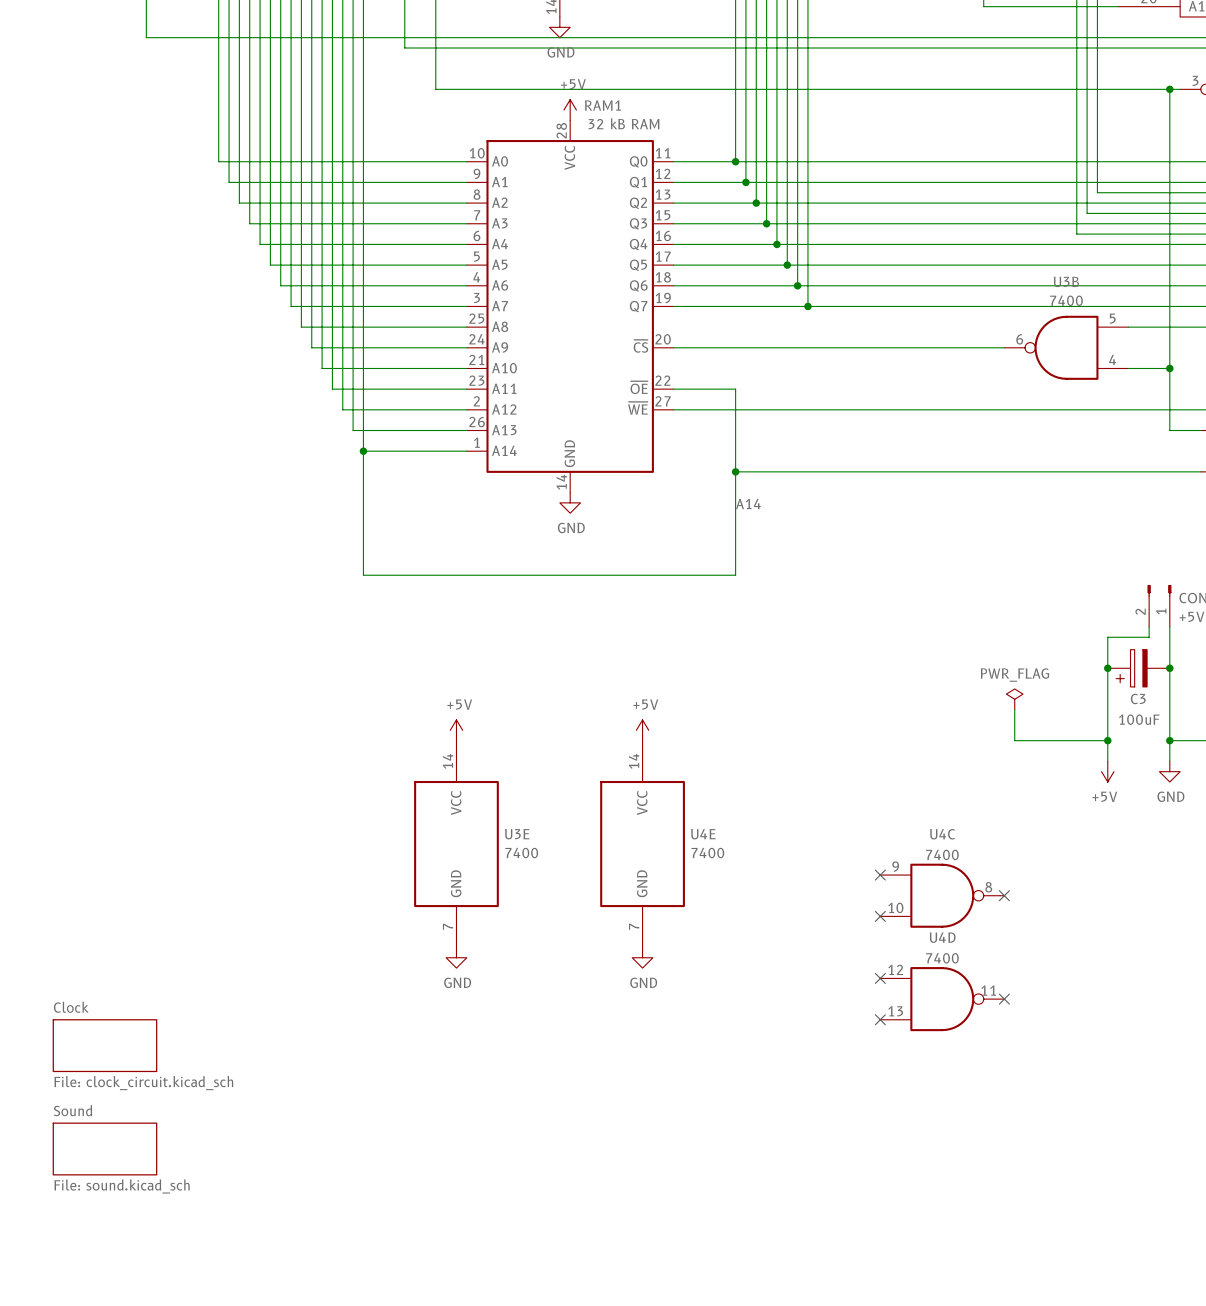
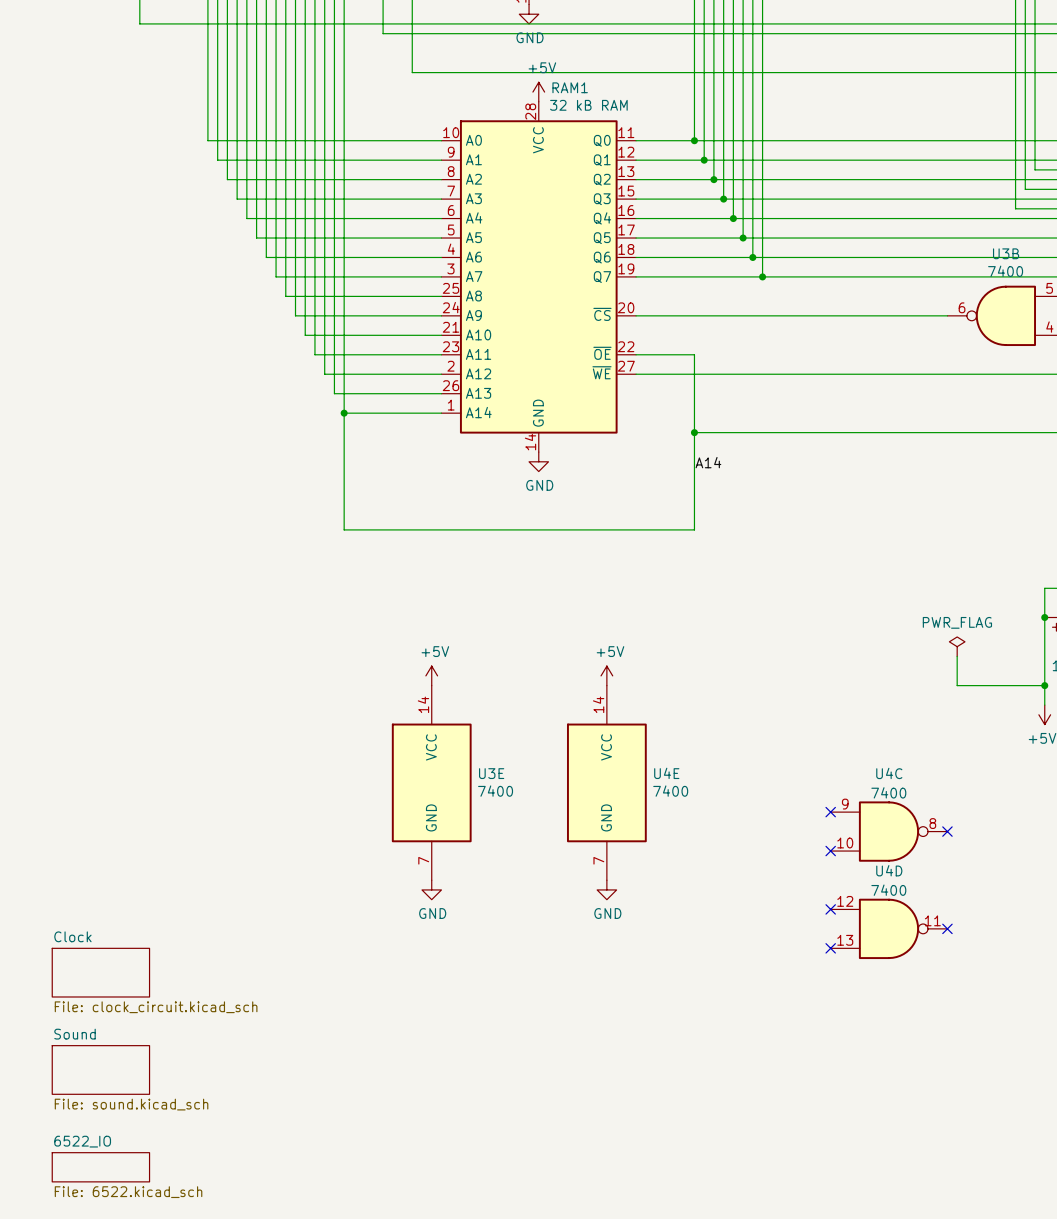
sheet 6522_IO: none -> File: 6522.kicad_sch (100, 1167)

